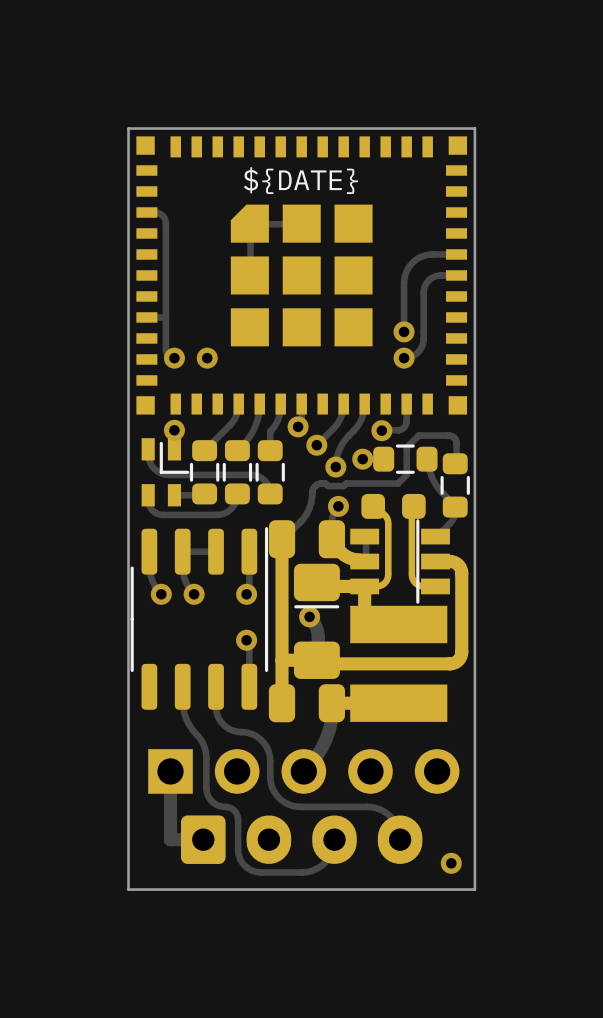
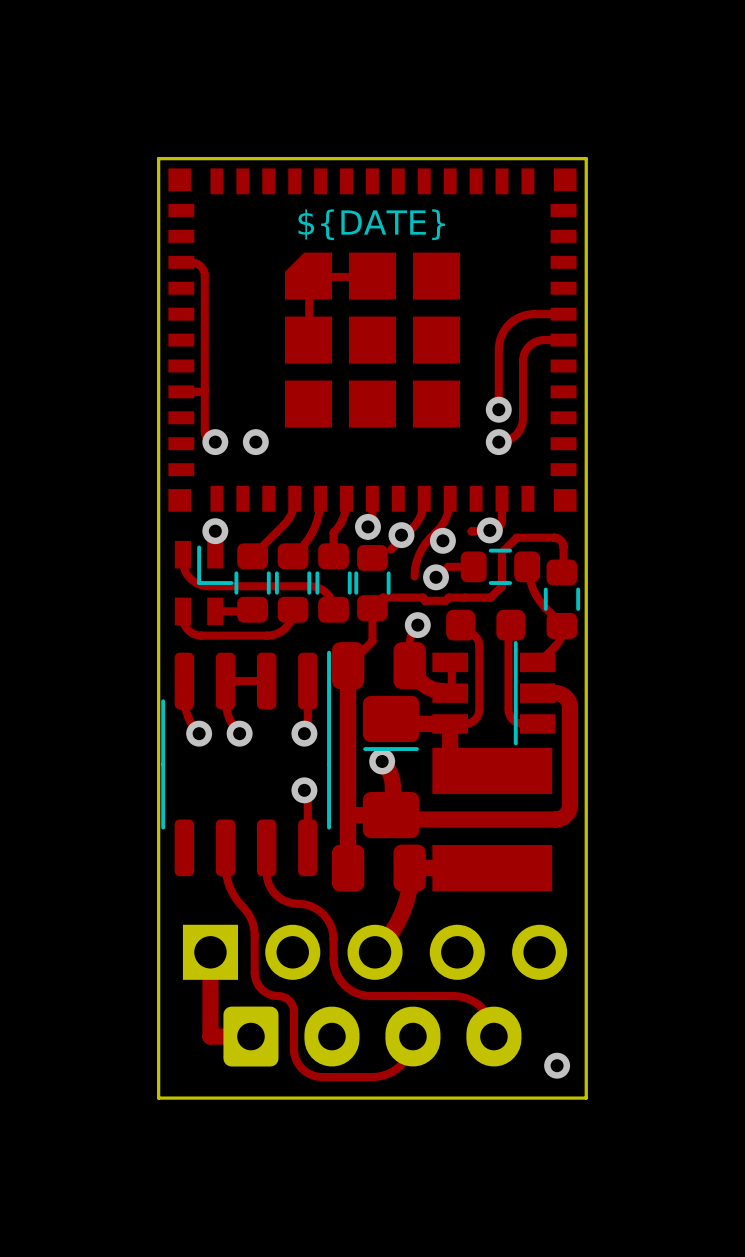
via position: (381, 430) -> (489, 530)
via: none -> (442, 540)
via position: (316, 445) -> (401, 535)
via: (362, 459) -> none
via: (335, 467) -> none
via: none -> (436, 577)
part: none -> (372, 583)
track: (398, 483) (346, 483) (343, 486) (318, 484) (312, 489) (311, 502) (306, 514) (283, 539) -> (491, 596) (448, 597) (445, 600) (424, 600)
track: none -> (426, 600) (423, 597) (382, 597) (372, 608) (372, 641) (348, 665)

